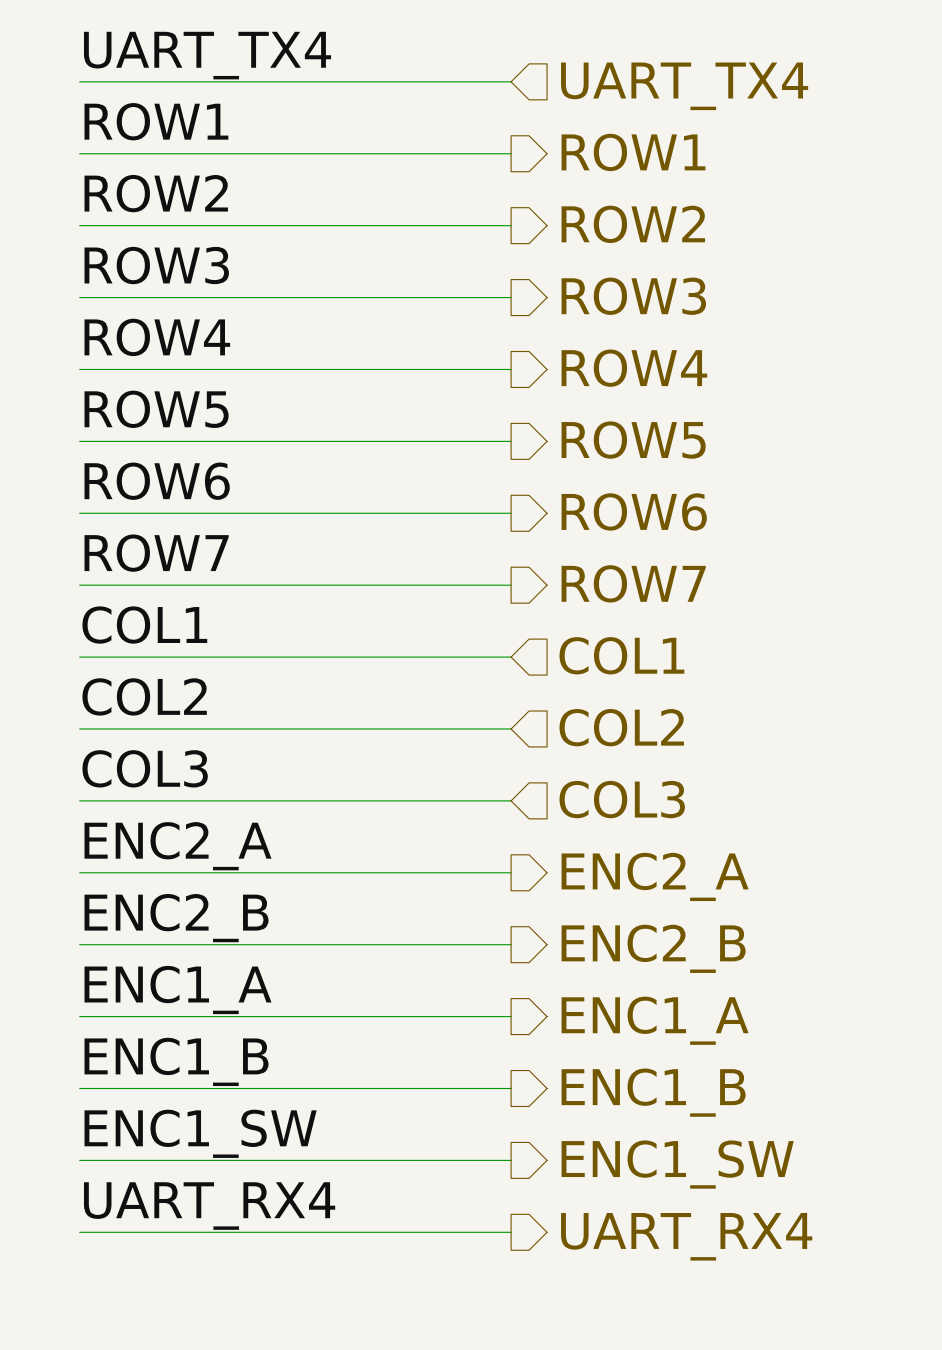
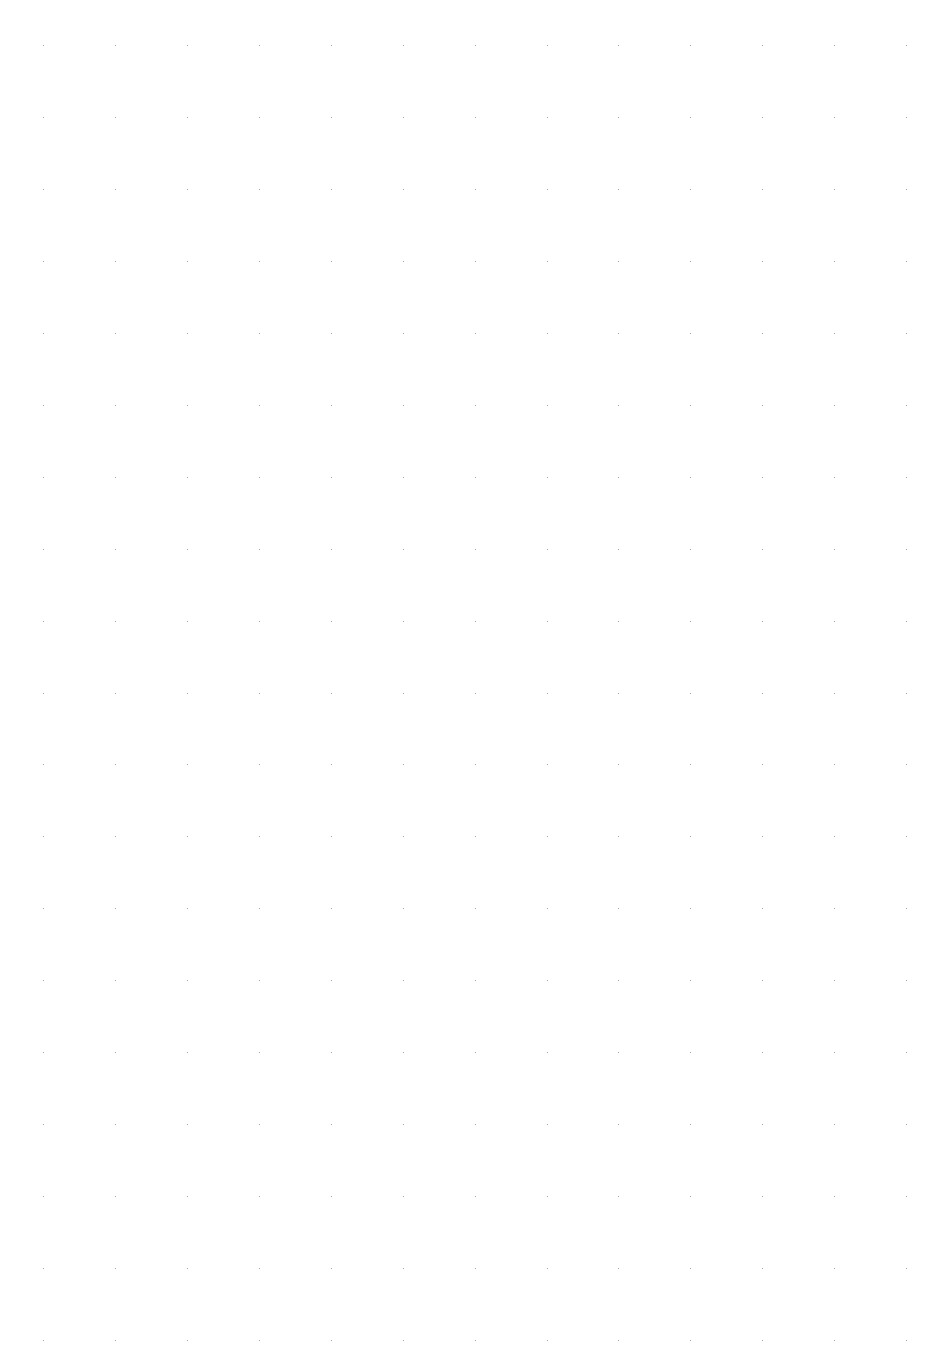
label: UART_TX4 (207, 55) -> none
wire: (79, 81) (511, 81) -> none
hierarchical label: UART_TX4 (684, 86) -> none
label: ROW1 (156, 121) -> none
hierarchical label: ROW1 (633, 152) -> none
wire: (79, 153) (511, 153) -> none
label: ROW2 (156, 193) -> none
hierarchical label: ROW2 (633, 224) -> none
wire: (79, 225) (511, 225) -> none
label: ROW3 (156, 265) -> none
hierarchical label: ROW3 (633, 296) -> none
wire: (79, 297) (511, 297) -> none
label: ROW4 (157, 337) -> none
hierarchical label: ROW4 (634, 368) -> none
wire: (79, 369) (511, 369) -> none
label: ROW5 (156, 409) -> none
hierarchical label: ROW5 (633, 440) -> none
wire: (79, 441) (511, 441) -> none
label: ROW6 (157, 481) -> none
hierarchical label: ROW6 (634, 511) -> none
wire: (79, 513) (511, 513) -> none
label: ROW7 (156, 553) -> none
hierarchical label: ROW7 (633, 583) -> none
wire: (79, 585) (511, 585) -> none
label: COL1 (144, 625) -> none
hierarchical label: COL1 (621, 655) -> none
wire: (79, 657) (511, 657) -> none
label: COL2 (144, 696) -> none
hierarchical label: COL2 (621, 727) -> none
wire: (79, 728) (511, 728) -> none
label: COL3 (145, 768) -> none
hierarchical label: COL3 (622, 799) -> none
wire: (79, 800) (511, 800) -> none
label: ENC2_A (178, 846) -> none
wire: (79, 872) (511, 872) -> none
hierarchical label: ENC2_A (655, 876) -> none
label: ENC2_B (176, 918) -> none
wire: (79, 944) (511, 944) -> none
hierarchical label: ENC2_B (653, 948) -> none
label: ENC1_A (178, 990) -> none
wire: (79, 1016) (511, 1016) -> none
hierarchical label: ENC1_A (655, 1020) -> none
label: ENC1_B (176, 1061) -> none
wire: (79, 1088) (511, 1088) -> none
hierarchical label: ENC1_B (653, 1092) -> none
label: ENC1_SW (200, 1133) -> none
wire: (79, 1160) (511, 1160) -> none
hierarchical label: ENC1_SW (677, 1164) -> none
label: UART_RX4 (209, 1206) -> none
wire: (79, 1232) (511, 1232) -> none
hierarchical label: UART_RX4 (686, 1236) -> none

